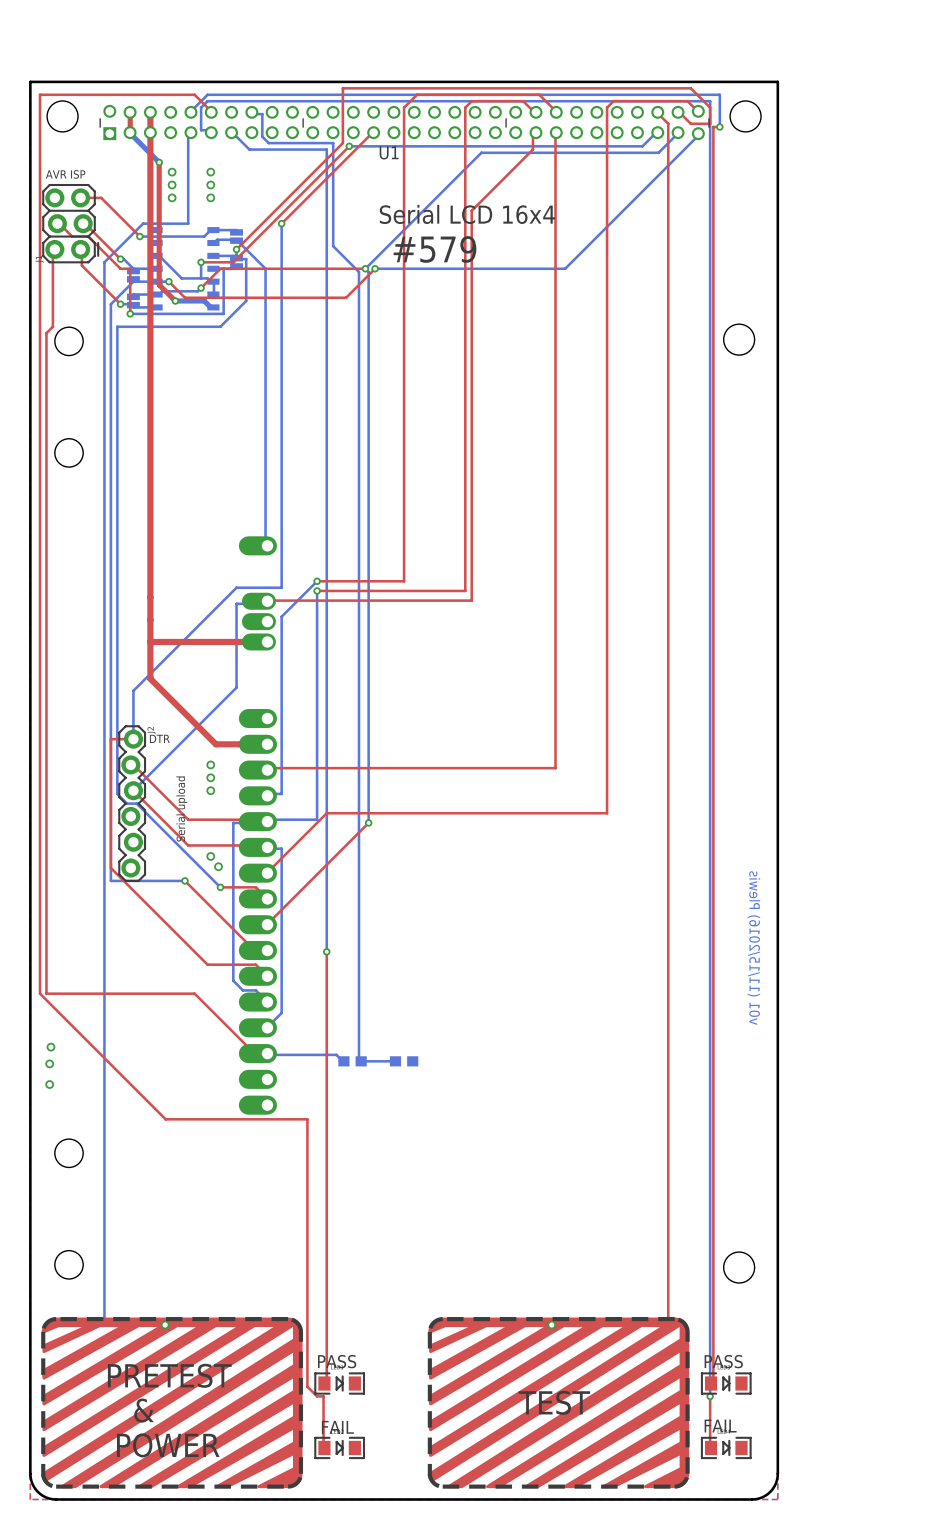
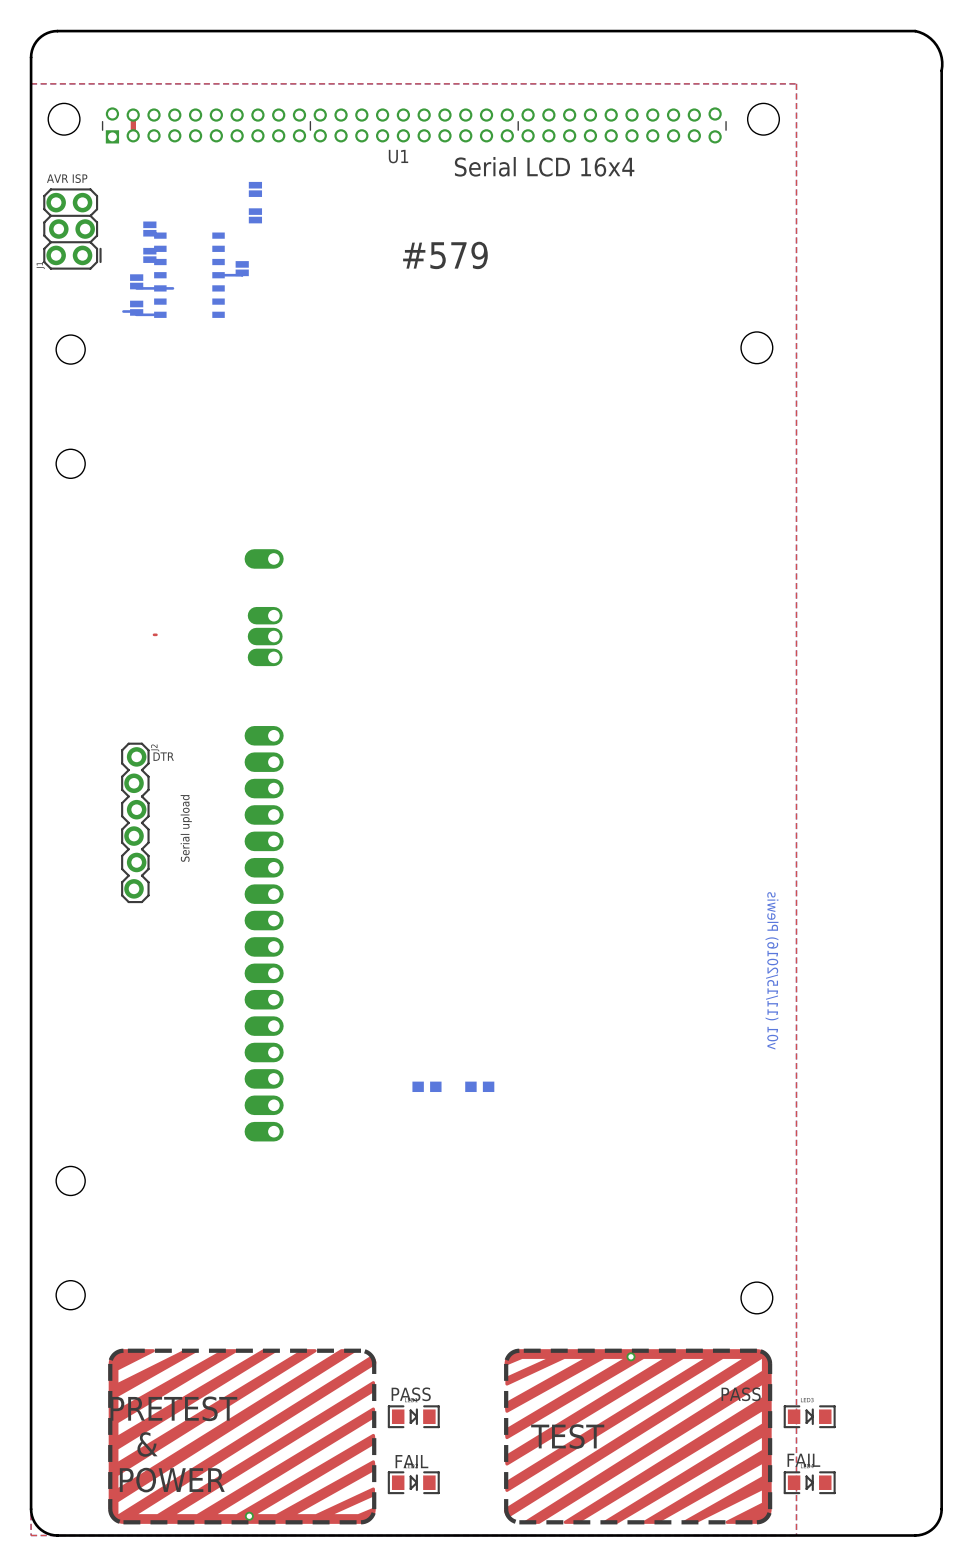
board edge: (30, 81) (777, 81) (777, 1473) (775, 1483) (770, 1491) (761, 1497) (752, 1499) -> (31, 83) (31, 54) (34, 44) (44, 34) (57, 31) (915, 31) (927, 36) (938, 49) (942, 61) (941, 1512) (933, 1527) (918, 1535) (770, 1535)
top track: (698, 111) (687, 101) (613, 101) (607, 107) (607, 813) (326, 813) (267, 873) -> none
top track: (150, 112) (150, 678) (215, 744) (267, 744) -> none
bottom track: (190, 112) (207, 94) (719, 94) (719, 127) -> none
top track: (211, 112) (194, 94) (40, 94) (40, 993) (165, 1119) (307, 1119) (307, 1386) (317, 1396) (323, 1396) (324, 1447) -> none
bottom track: (251, 112) (252, 114) (262, 114) (262, 136) (268, 143) (333, 143) (333, 246) (358, 271) (358, 1061) (395, 1061) -> none
top track: (536, 112) (523, 101) (471, 101) (465, 107) (465, 590) (317, 590) -> none
top track: (556, 112) (539, 94) (416, 94) (404, 107) (404, 581) (317, 581) -> none
top track: (657, 112) (668, 123) (668, 1322) (552, 1322) (551, 1325) -> none
top track: (678, 112) (690, 123) (710, 123) (710, 107) (690, 88) (342, 88) (342, 143) (236, 249) -> none
top track: (719, 127) (713, 127) (713, 1383) (711, 1383) -> none
via: (719, 127) -> none
bottom track: (130, 132) (159, 162) -> none
bottom track: (190, 132) (188, 133) (188, 223) (143, 223) (104, 262) (104, 1322) (162, 1322) (165, 1325) -> none
bottom track: (211, 132) (210, 130) (201, 130) (201, 107) (207, 101) (710, 101) (710, 1396) -> none
bottom track: (231, 132) (249, 149) (326, 149) (326, 951) -> none
top track: (373, 132) (281, 223) -> none
top track: (536, 132) (532, 133) (532, 149) (471, 210) (471, 600) (267, 601) -> none
top track: (556, 132) (555, 768) (268, 768) (267, 770) -> none
bottom track: (657, 132) (642, 146) (349, 146) -> none
bottom track: (678, 132) (658, 152) (481, 152) (365, 268) (368, 271) (368, 822) -> none
bottom track: (698, 133) (565, 268) (375, 268) -> none
top track: (349, 146) (233, 262) (201, 262) -> none
via: (349, 146) -> none
top track: (159, 162) (159, 284) (175, 300) -> none
via: (159, 162) -> none
via: (172, 172) -> none
via: (210, 172) -> none
via: (172, 185) -> none
via: (210, 185) -> none
part: none -> (255, 189)
top track: (80, 197) (101, 197) (139, 236) -> none
via: (172, 197) -> none
via: (210, 197) -> none
part: none -> (255, 215)
text position: Serial LCD 16x4 (467, 214) -> Serial LCD 16x4 (544, 166)
top track: (57, 223) (72, 236) (88, 236) (120, 268) (130, 268) (130, 313) -> none
top track: (83, 223) (120, 259) -> none
part: none -> (149, 229)
bottom track: (281, 223) (281, 587) (236, 587) (133, 690) (133, 739) -> none
via: (281, 223) -> none
bottom track: (236, 232) (236, 230) (210, 230) (204, 236) (139, 236) -> none
via: (139, 236) -> none
part: (236, 236) -> none
bottom track: (236, 239) (217, 239) (213, 242) -> none
bottom track: (236, 239) (265, 268) (265, 545) (267, 545) -> none
top track: (54, 249) (52, 249) (52, 326) (46, 333) (46, 993) (194, 993) (252, 1051) (265, 1051) (267, 1053) -> none
top track: (80, 249) (81, 265) (120, 304) -> none
part: none -> (149, 255)
bottom track: (236, 249) (236, 259) (246, 259) (246, 300) (220, 326) (117, 326) (117, 793) (127, 803) (136, 803) (220, 887) -> none
via: (236, 249) -> none
bottom track: (159, 255) (181, 278) (207, 278) (213, 281) (213, 294) -> none
bottom track: (213, 255) (236, 255) -> none
bottom track: (120, 259) (123, 259) (133, 268) -> none
via: (120, 259) -> none
bottom track: (201, 262) (201, 278) -> none
via: (201, 262) -> none
bottom track: (133, 268) (156, 268) -> none
bottom track: (223, 268) (223, 313) (130, 313) -> none
top track: (365, 268) (220, 268) (201, 288) -> none
via: (365, 268) -> none
top track: (375, 268) (346, 297) (185, 297) (168, 281) -> none
via: (375, 268) -> none
bottom track: (133, 279) (133, 281) (110, 304) (110, 880) (185, 880) -> none
via: (168, 281) -> none
bottom track: (201, 288) (197, 291) (162, 291) (159, 294) (133, 294) (133, 296) -> none
via: (201, 288) -> none
bottom track: (175, 300) (204, 300) (210, 307) (213, 307) -> none
via: (175, 300) -> none
via: (120, 304) -> none
via: (130, 313) -> none
bottom track: (317, 581) (281, 616) (281, 793) (268, 793) (267, 795) -> none
via: (317, 581) -> none
bottom track: (317, 590) (317, 819) (268, 819) (265, 822) (233, 822) (233, 980) (242, 990) (255, 990) (267, 1002) -> none
via: (317, 590) -> none
bottom track: (267, 601) (265, 603) (236, 603) (236, 687) (133, 790) -> none
top track: (150, 641) (267, 641) -> none
top track: (133, 739) (110, 739) (110, 868) (207, 964) (255, 964) (267, 976) -> none
top track: (130, 764) (133, 764) (188, 819) (265, 819) (267, 821) -> none
via: (210, 764) -> none
via: (210, 777) -> none
top track: (133, 790) (188, 845) (265, 845) (267, 847) -> none
via: (210, 790) -> none
top track: (368, 822) (267, 924) -> none
via: (368, 822) -> none
bottom track: (267, 847) (281, 848) (281, 1013) (267, 1027) -> none
via: (210, 856) -> none
via: (218, 866) -> none
top track: (185, 880) (252, 948) (265, 948) (267, 950) -> none
via: (185, 880) -> none
top track: (220, 887) (255, 887) (267, 898) -> none
via: (220, 887) -> none
top track: (326, 951) (326, 1383) (324, 1383) -> none
via: (326, 951) -> none
via: (50, 1047) -> none
bottom track: (267, 1053) (336, 1054) (343, 1061) -> none
part: (352, 1061) -> none
part position: (404, 1061) -> (426, 1086)
part: none -> (479, 1086)
via: (49, 1063) -> none
via: (49, 1084) -> none
text position: PASS (337, 1361) -> PASS (411, 1394)
part position: (339, 1383) -> (413, 1416)
part position: (726, 1383) -> (809, 1416)
top track: (710, 1396) (711, 1447) -> none
via: (710, 1396) -> none
part rotation: 0° (172, 1402) -> 180° (242, 1436)
part position: (558, 1402) -> (638, 1436)
text position: FAIL (720, 1426) -> FAIL (803, 1460)
text position: FAIL (337, 1427) -> FAIL (411, 1461)
part position: (339, 1447) -> (413, 1482)
part position: (726, 1447) -> (809, 1482)

